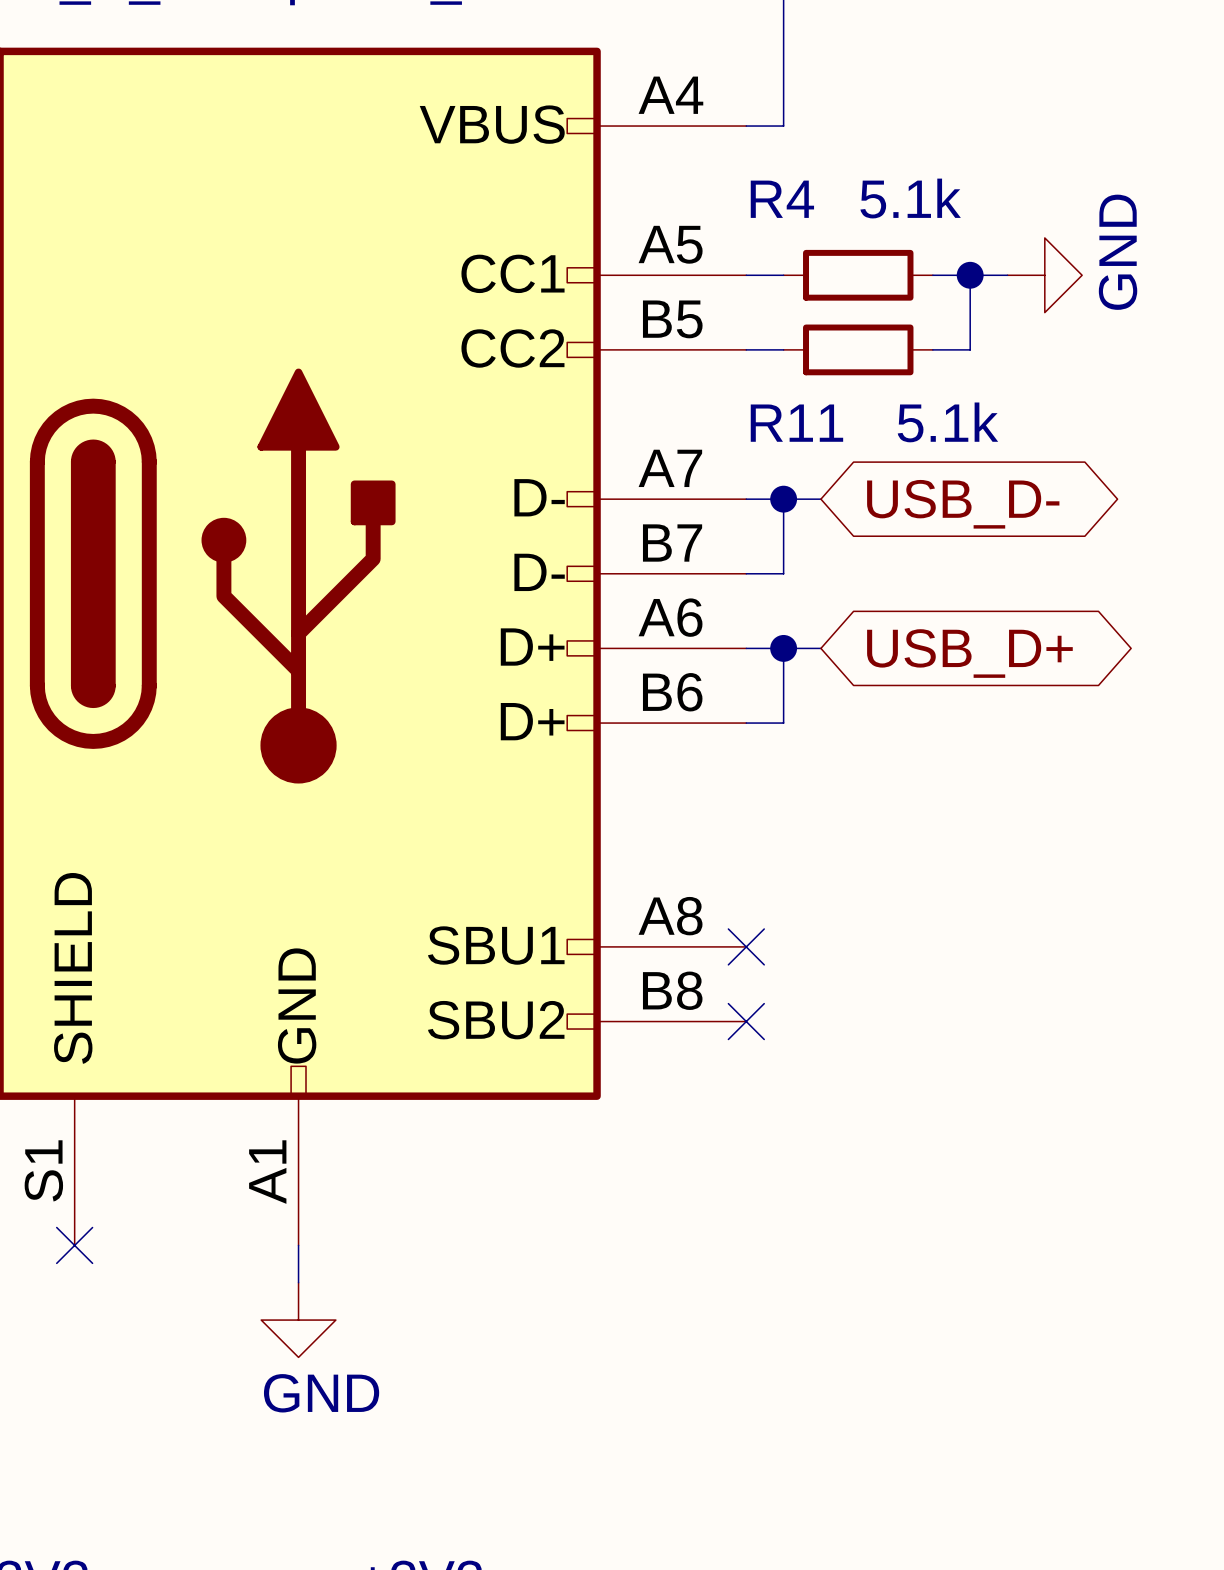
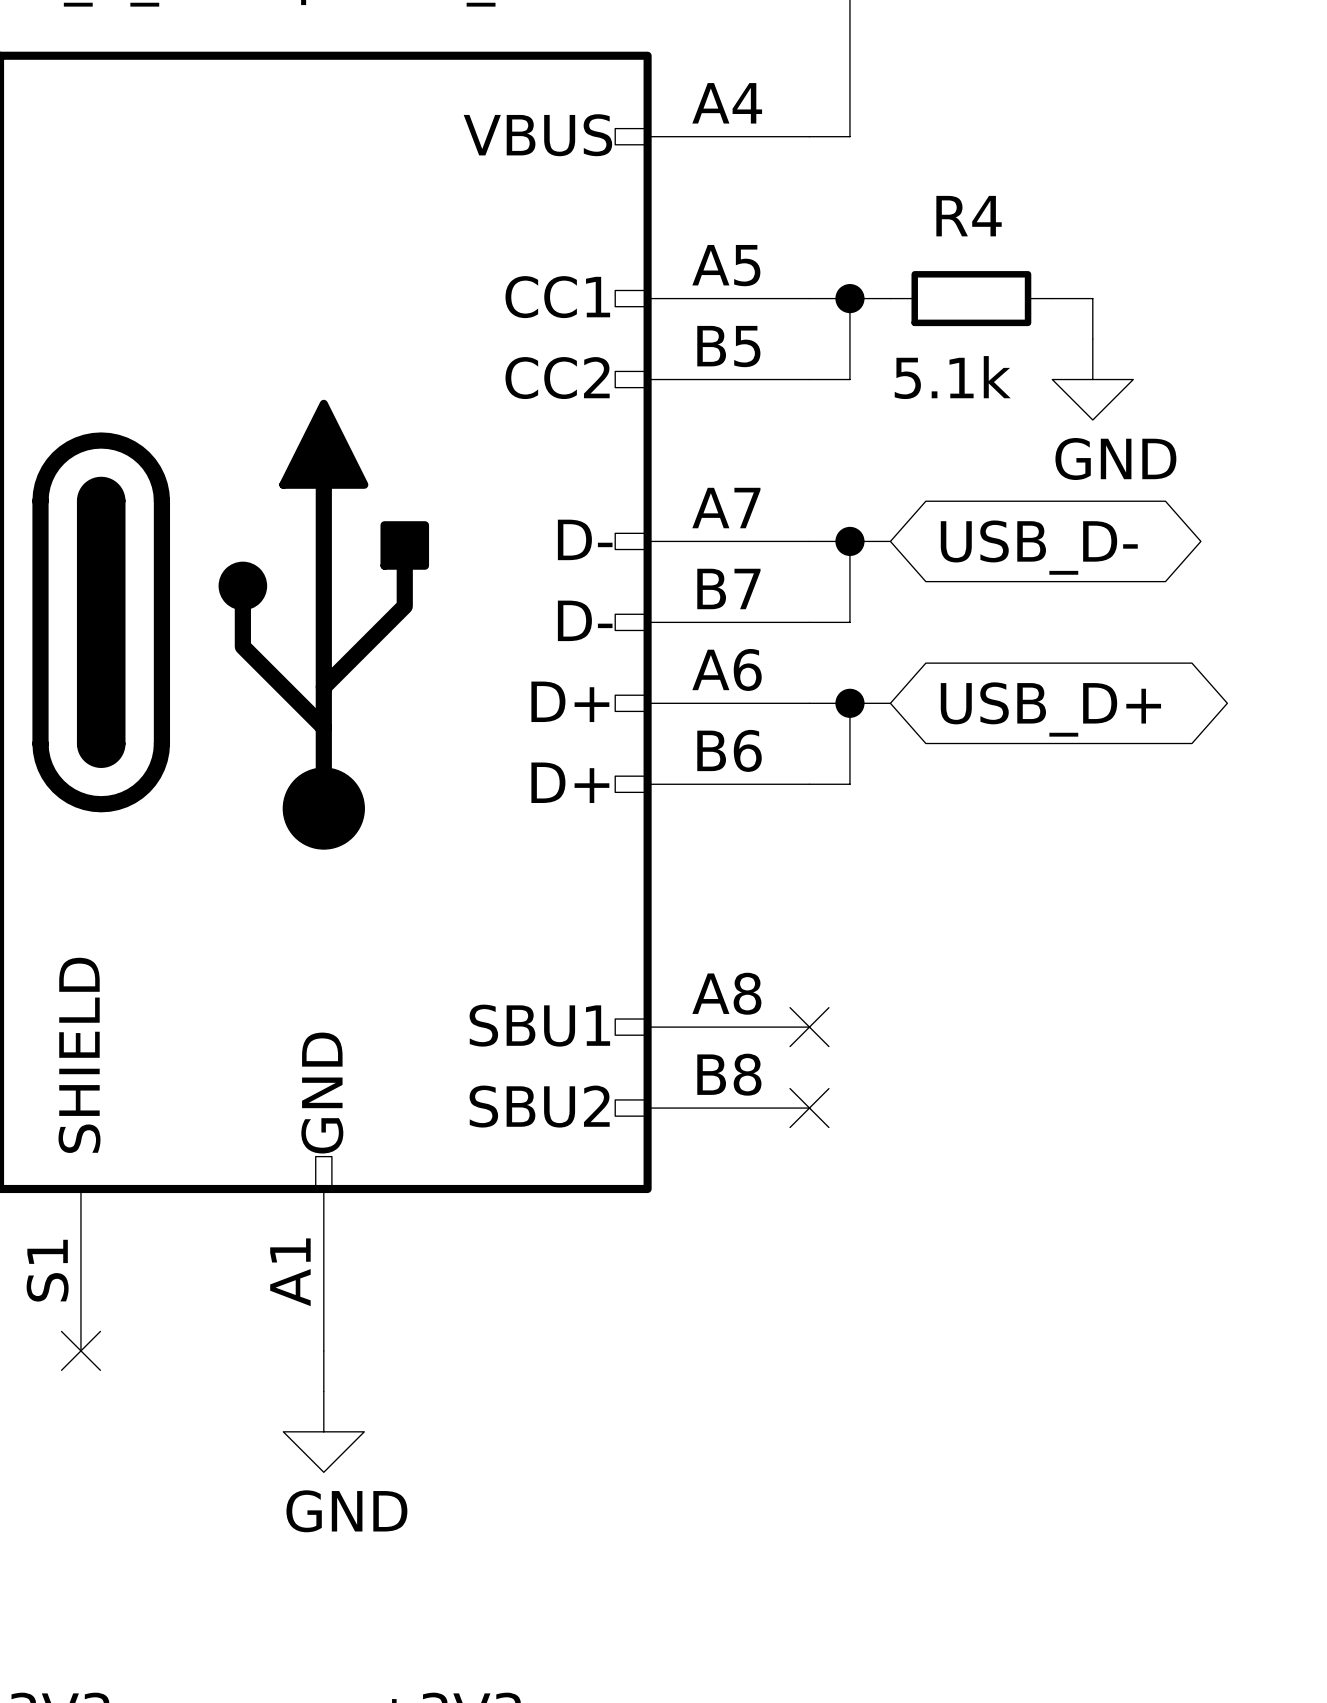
R4 value position: 5.1k (910, 198) -> 5.1k (952, 377)
R4 name position: R4 (782, 199) -> R4 (969, 216)
junction: none -> (849, 298)
wire: none -> (890, 298) (849, 298) (849, 379)
R4 position: (858, 275) -> (971, 298)
wire: (932, 275) (970, 275) (970, 349) (932, 349) -> none
junction: (970, 275) -> none
wire: none -> (1092, 298) (1092, 339)
power symbol rotation: 0° (1044, 275) -> 90° clockwise (1092, 379)
power symbol position: GND (1044, 275) -> GND (1092, 379)
R11: 5.1k (858, 349) -> none

